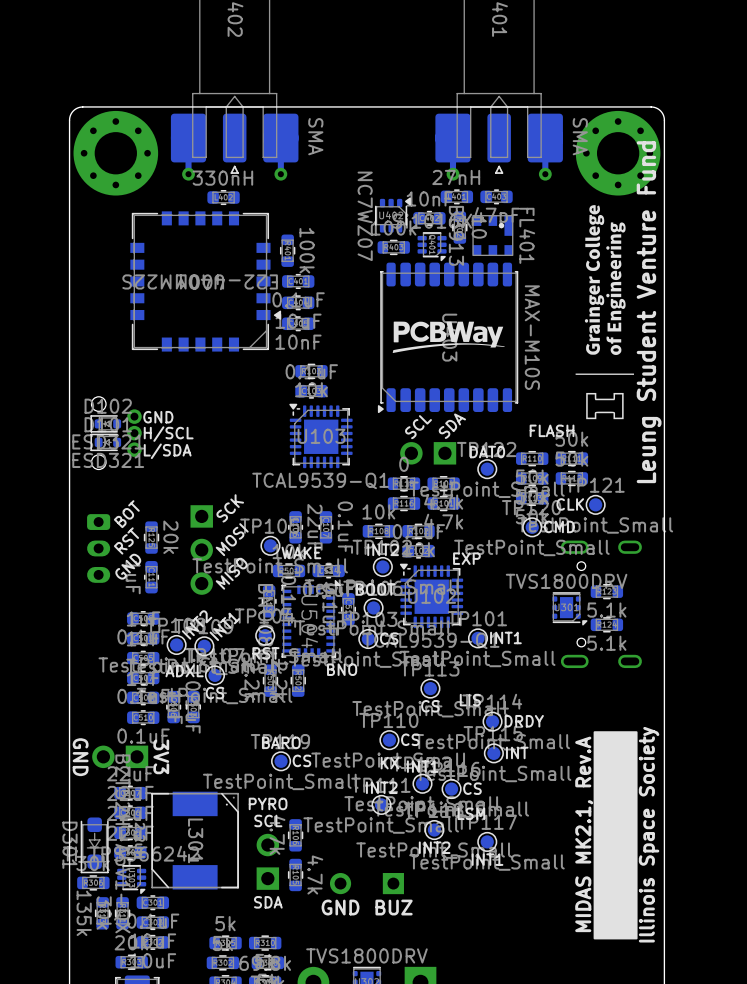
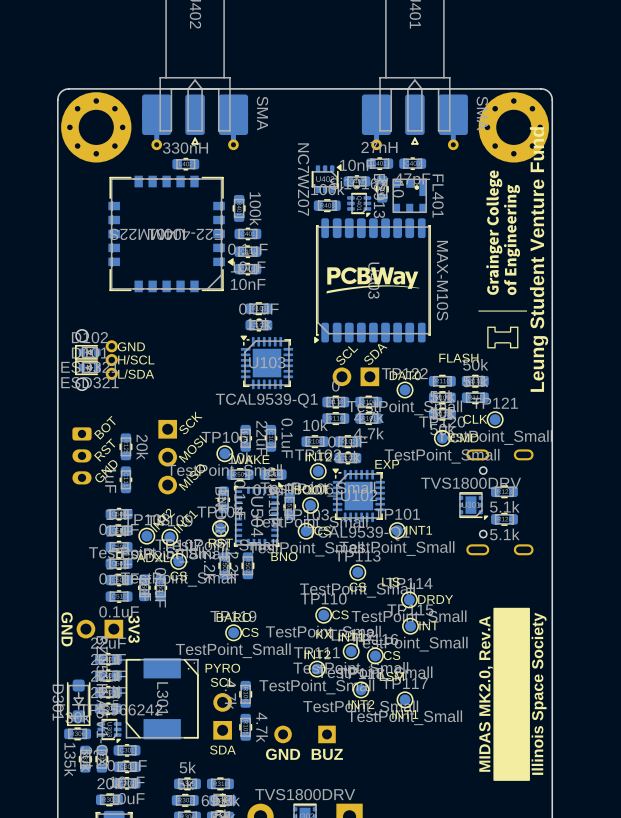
text: MIDAS MK2.1, Rev.A (584, 834) -> MIDAS MK2.0, Rev.A (485, 694)

